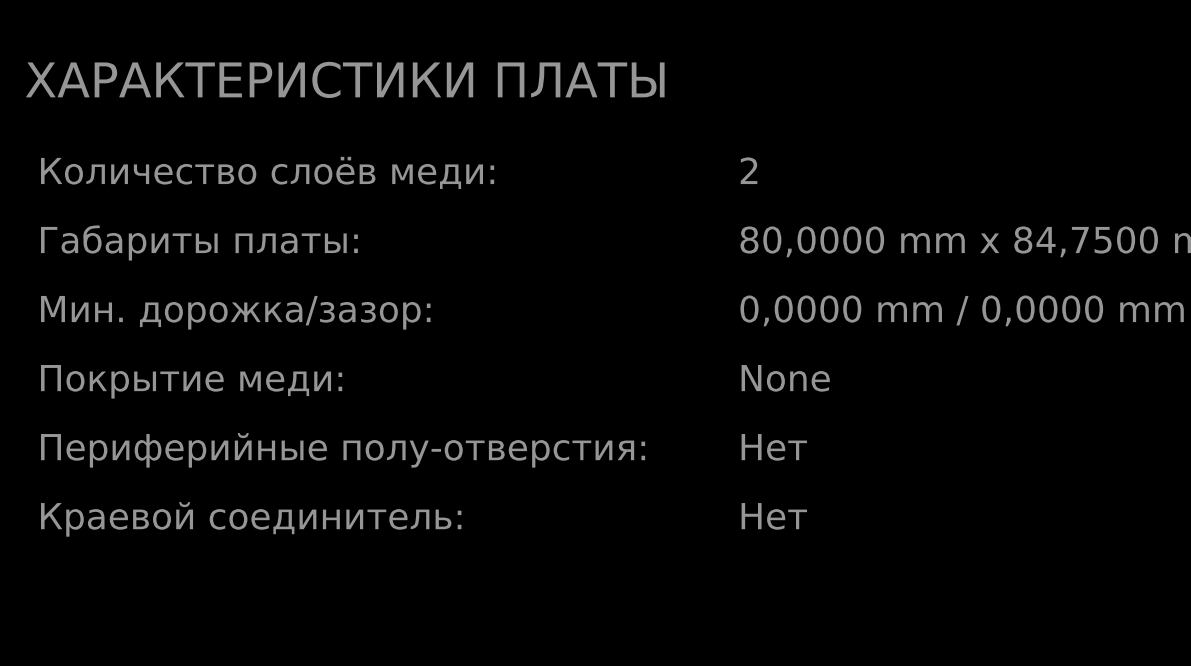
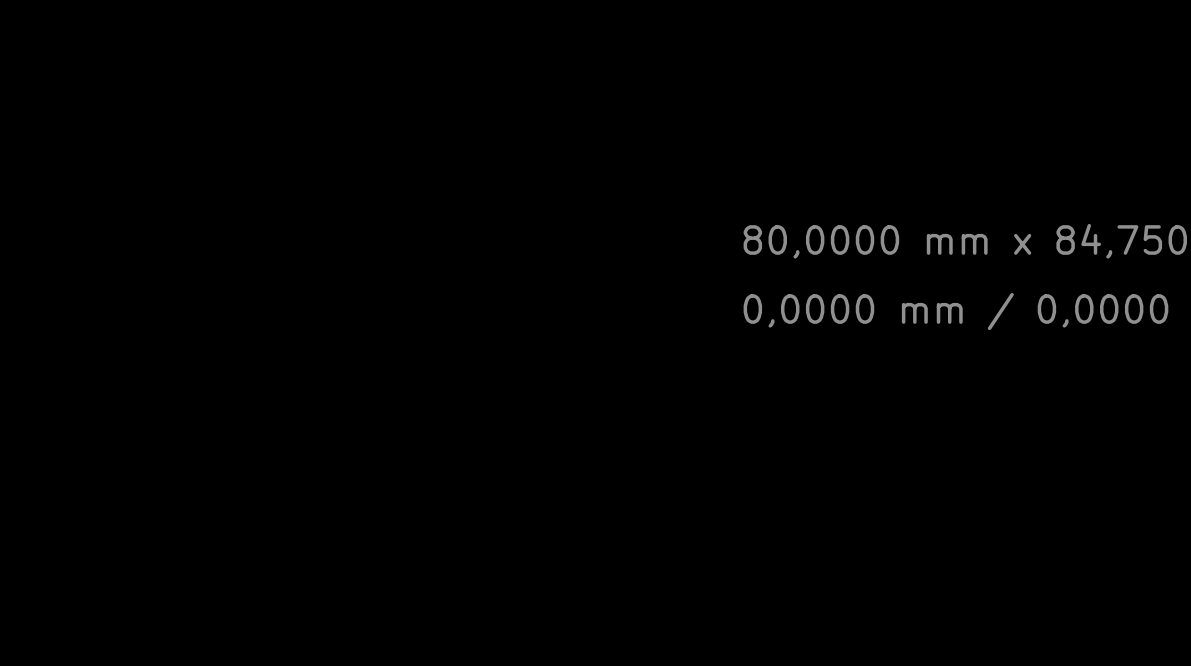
text: ХАРАКТЕРИСТИКИ ПЛАТЫ (345, 79) -> none
text: 2 (749, 170) -> none
text: Количество слоёв меди: (267, 172) -> none
text: Габариты платы: (199, 242) -> none
text: Мин. дорожка/зазор: (235, 312) -> none
text: None (785, 378) -> none
text: Покрытие меди: (191, 381) -> none
text: Нет (774, 447) -> none
text: Периферийные полу-отверстия: (343, 450) -> none
text: Нет (774, 516) -> none
text: Краевой соединитель: (251, 519) -> none

